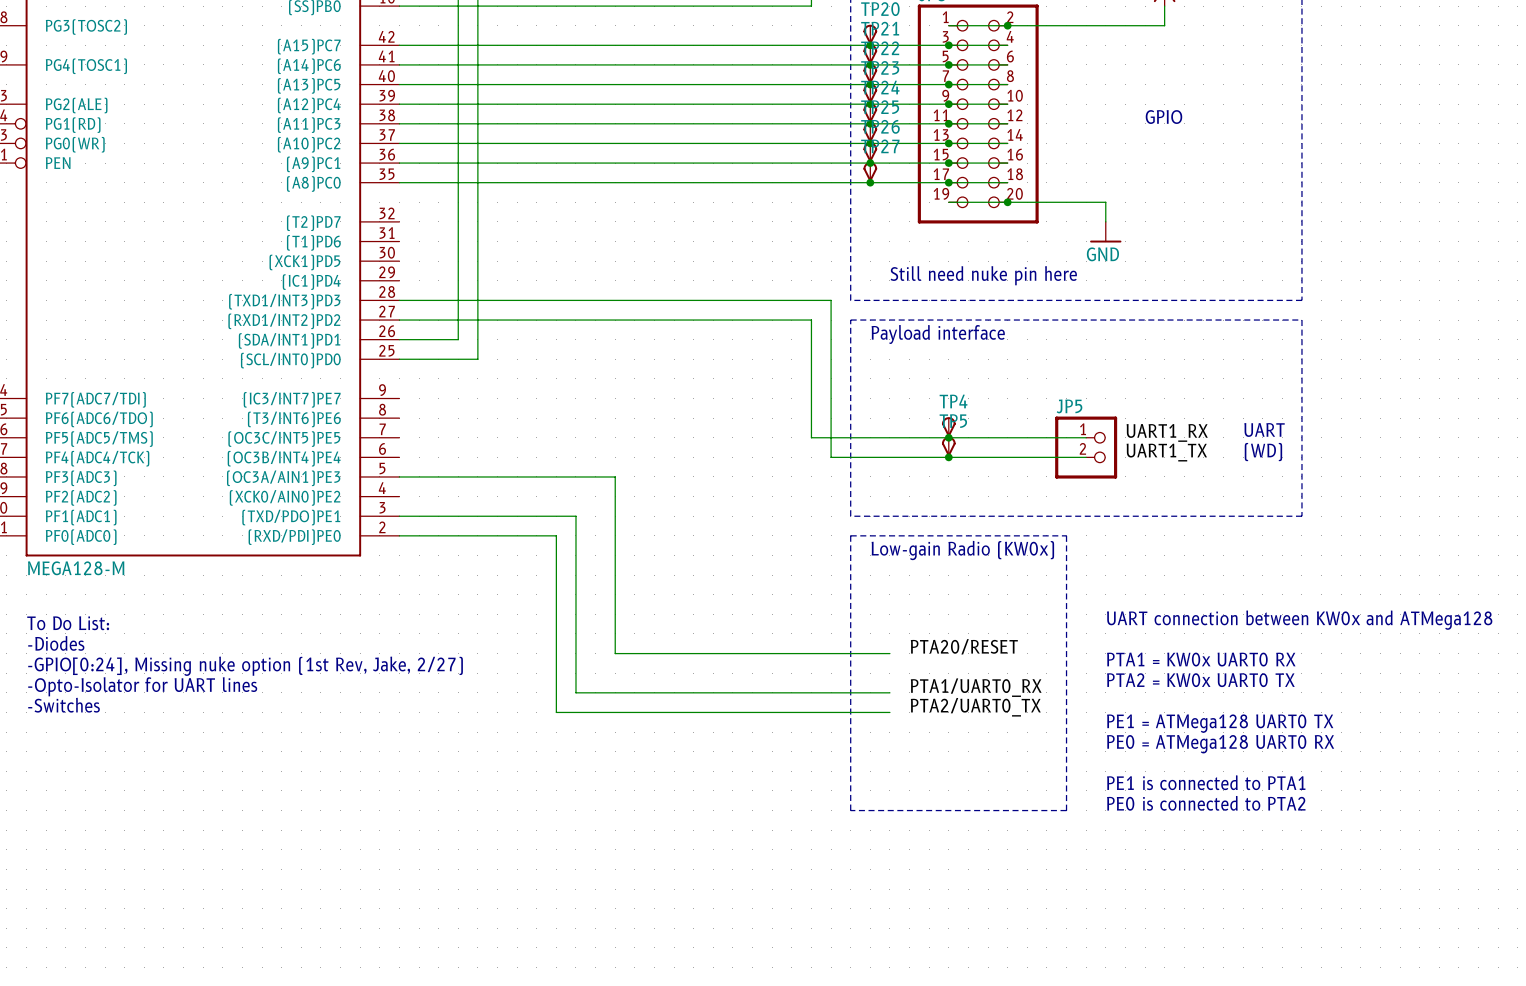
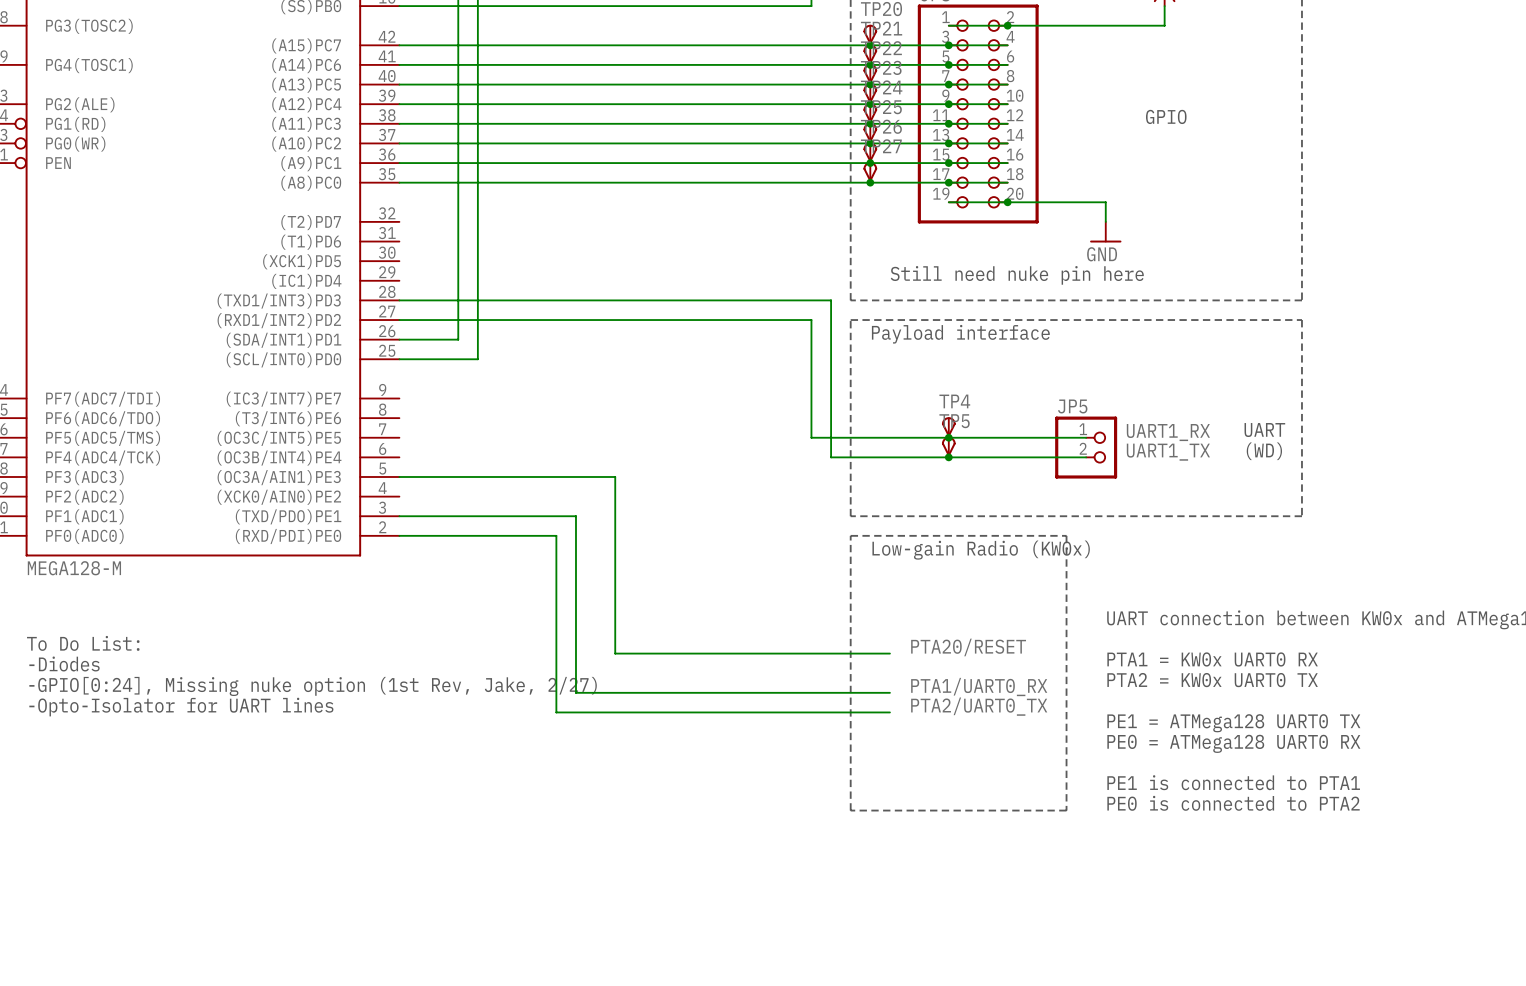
text: To Do List: (68, 623) -> none
text: -Diodes (56, 643) -> To Do List: (83, 643)
text: -GPIO[0:24], Missing nuke option (1st Rev, Jake, 2/27) (245, 666) -> -Diodes (64, 664)
text: -Opto-Isolator for UART lines (142, 686) -> -GPIO[0:24], Missing nuke option (1st Rev, Jake, 2/27) (313, 686)
text: -Switches (64, 705) -> -Opto-Isolator for UART lines (181, 707)

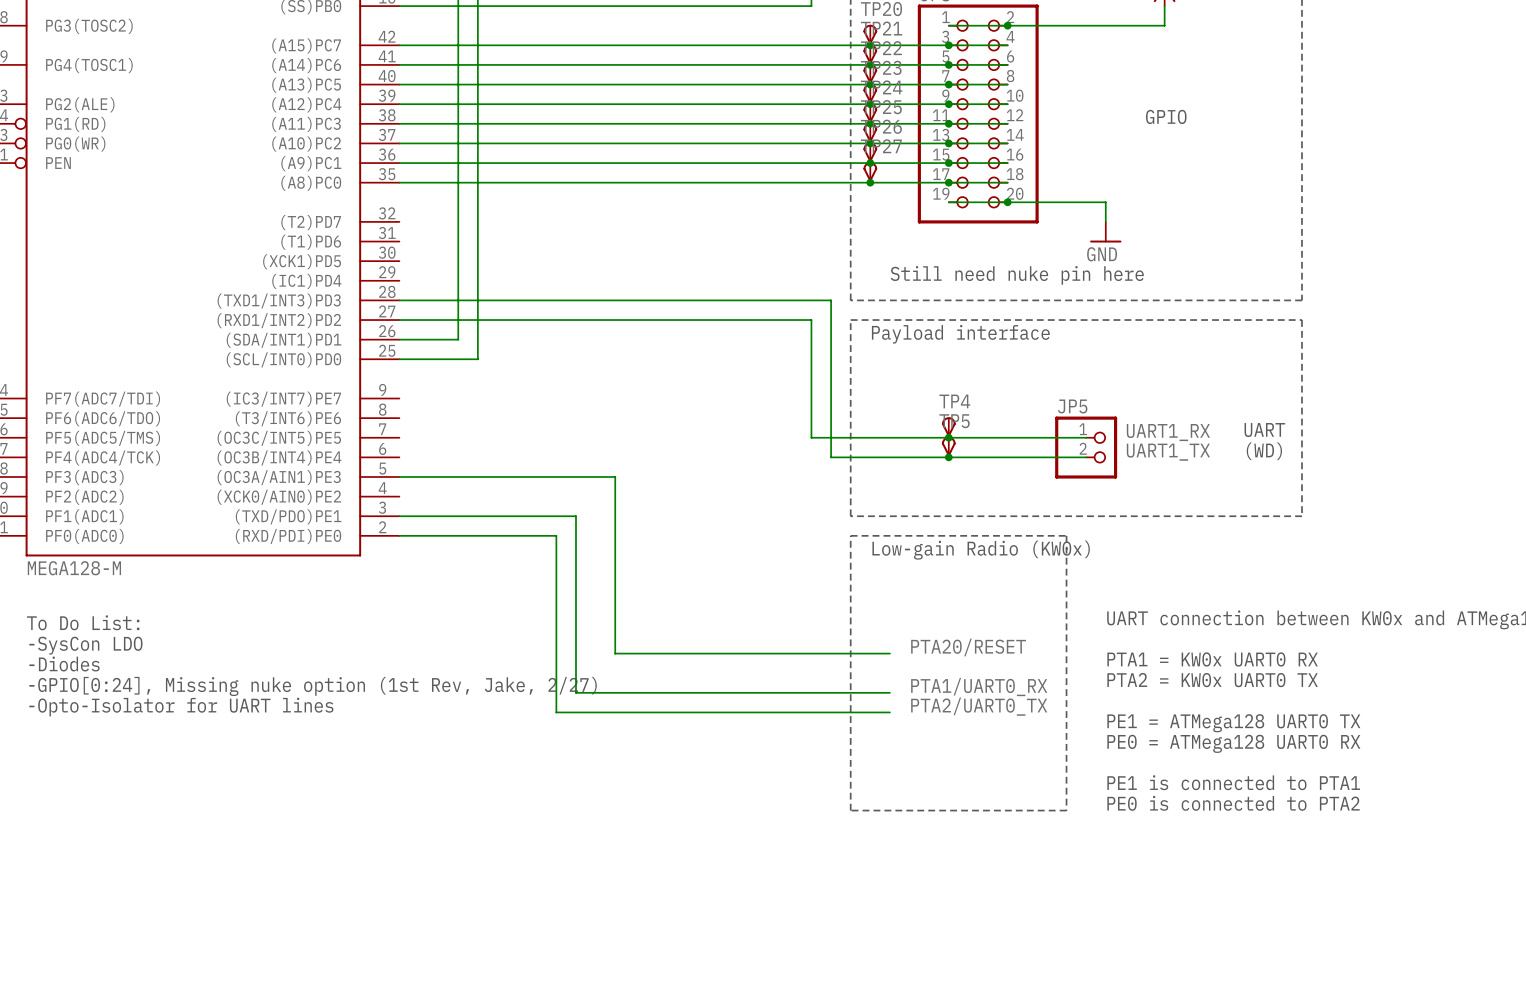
text: none -> To Do List: (83, 622)
text: To Do List: (83, 643) -> -SysCon LDO (85, 645)

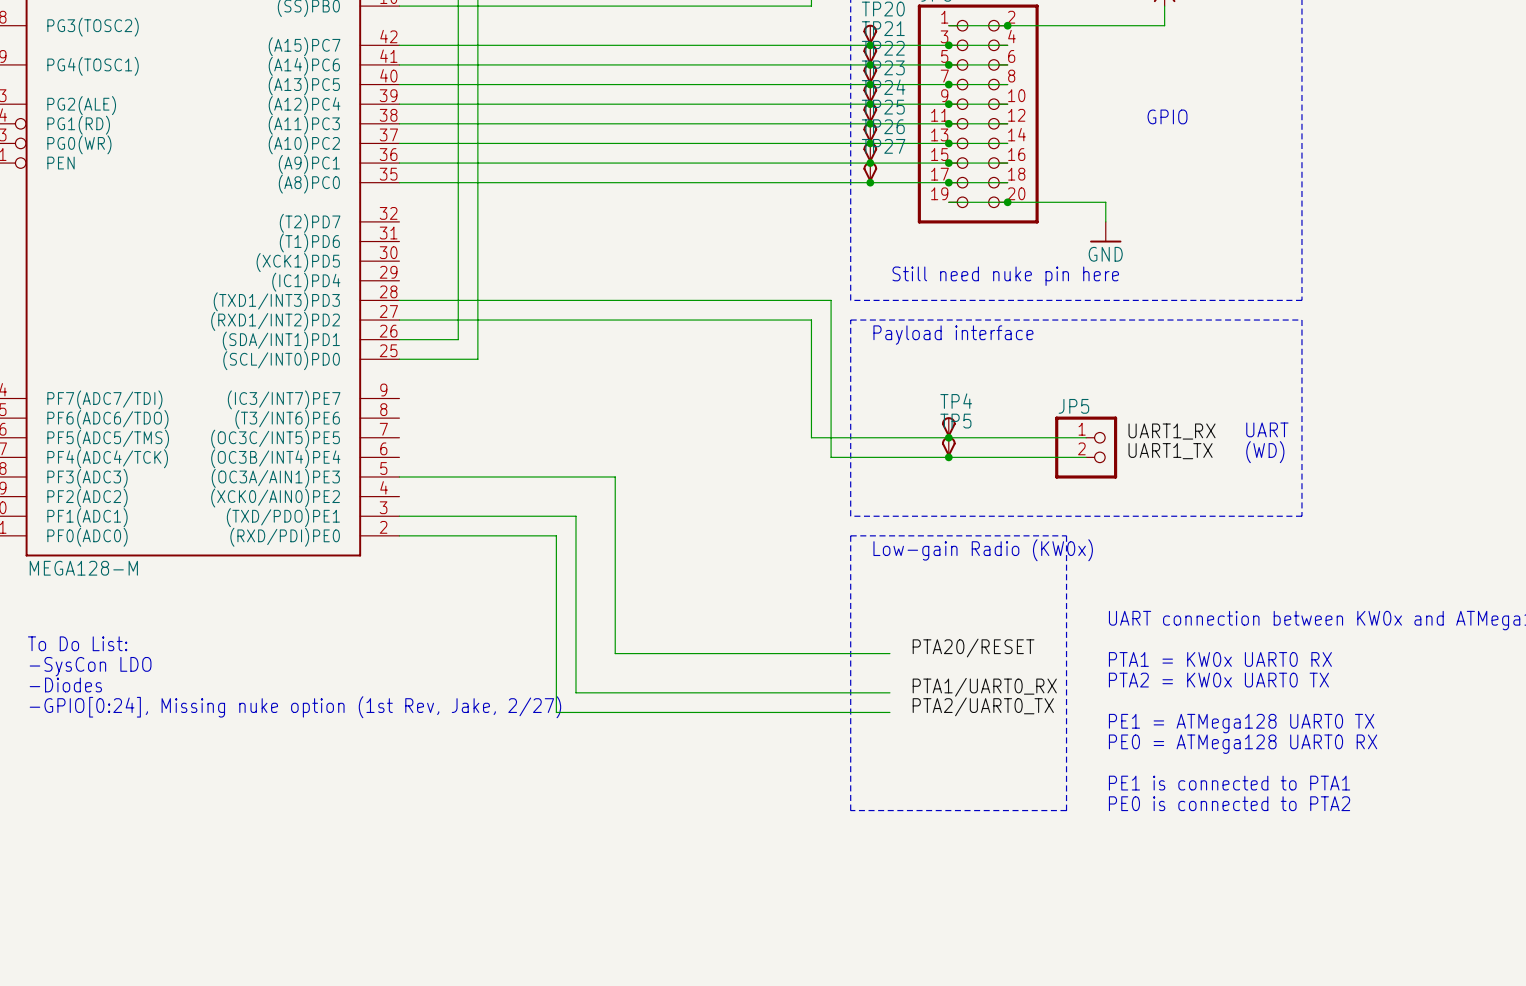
text: To Do List: (83, 622) -> none
text: -SysCon LDO (85, 645) -> To Do List: (77, 643)
text: -Diodes (64, 664) -> -SysCon LDO (90, 666)
text: -GPIO[0:24], Missing nuke option (1st Rev, Jake, 2/27) (313, 686) -> -Diodes (65, 684)
text: -Opto-Isolator for UART lines (181, 707) -> -GPIO[0:24], Missing nuke option (1st Rev, Jake, 2/27) (295, 707)

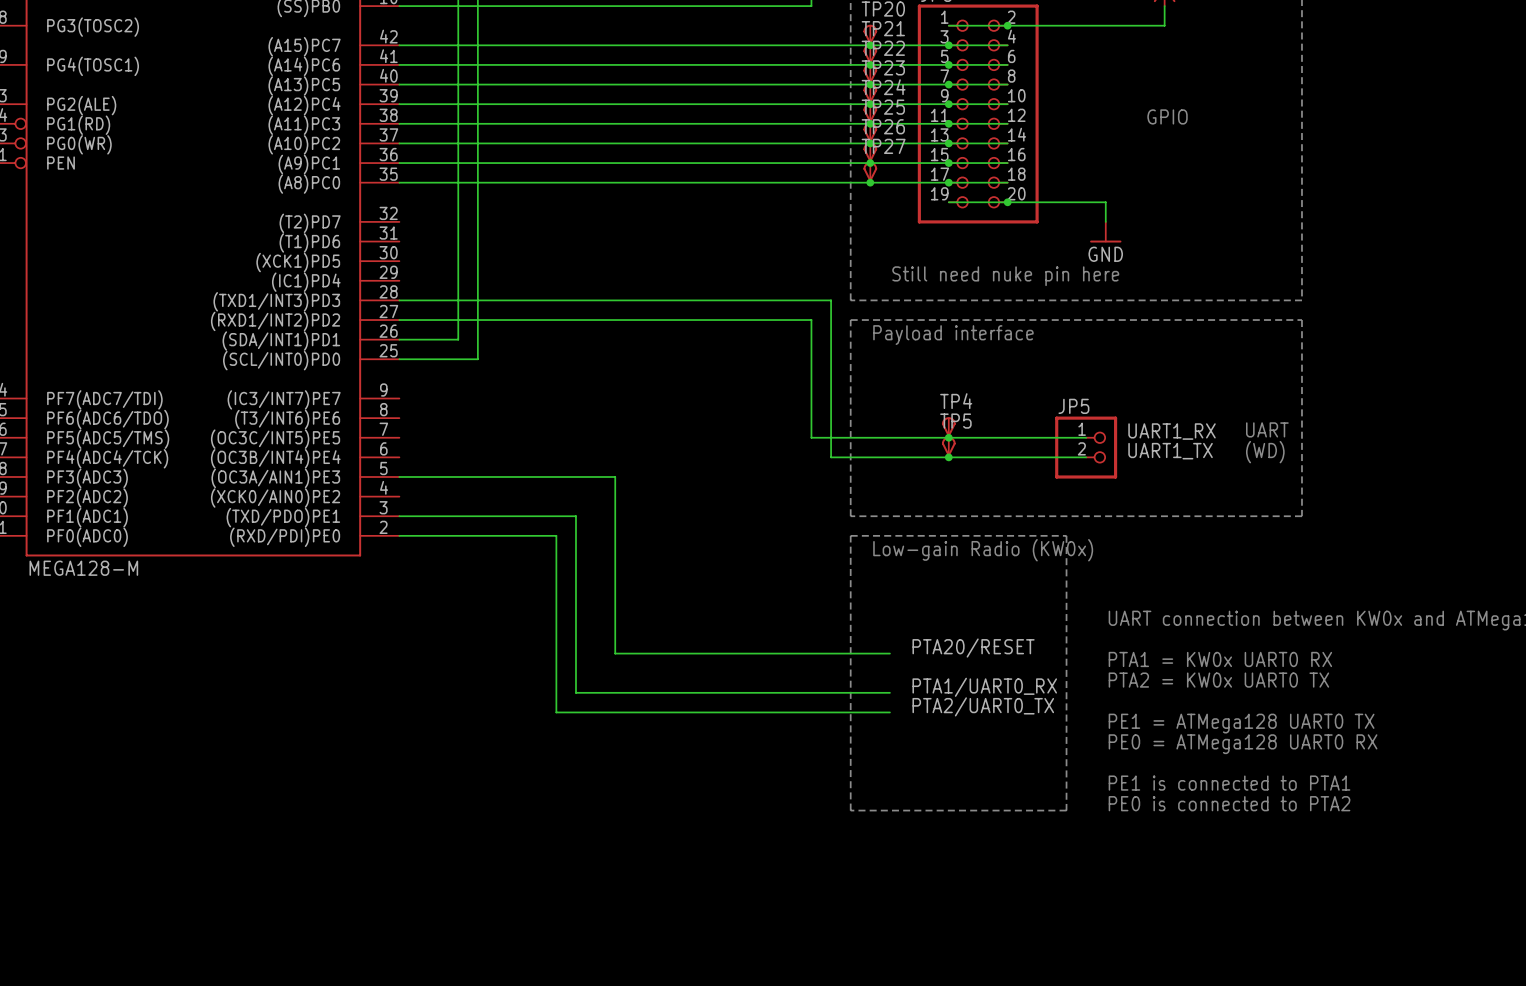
text: To Do List: (77, 643) -> none
text: -SysCon LDO (90, 666) -> none
text: -Diodes (65, 684) -> none
text: -GPIO[0:24], Missing nuke option (1st Rev, Jake, 2/27) (295, 707) -> none

